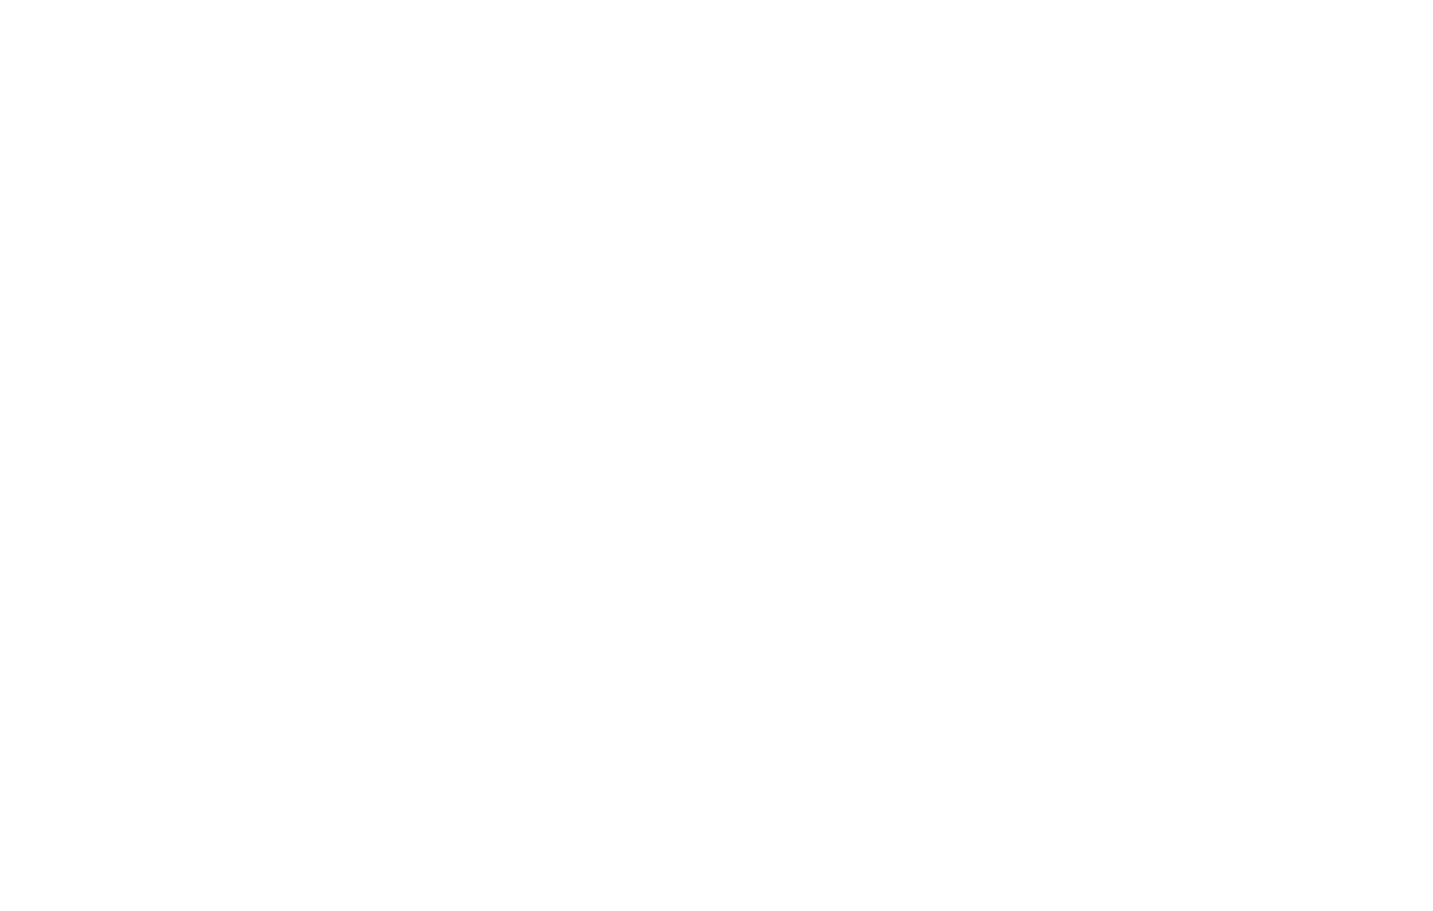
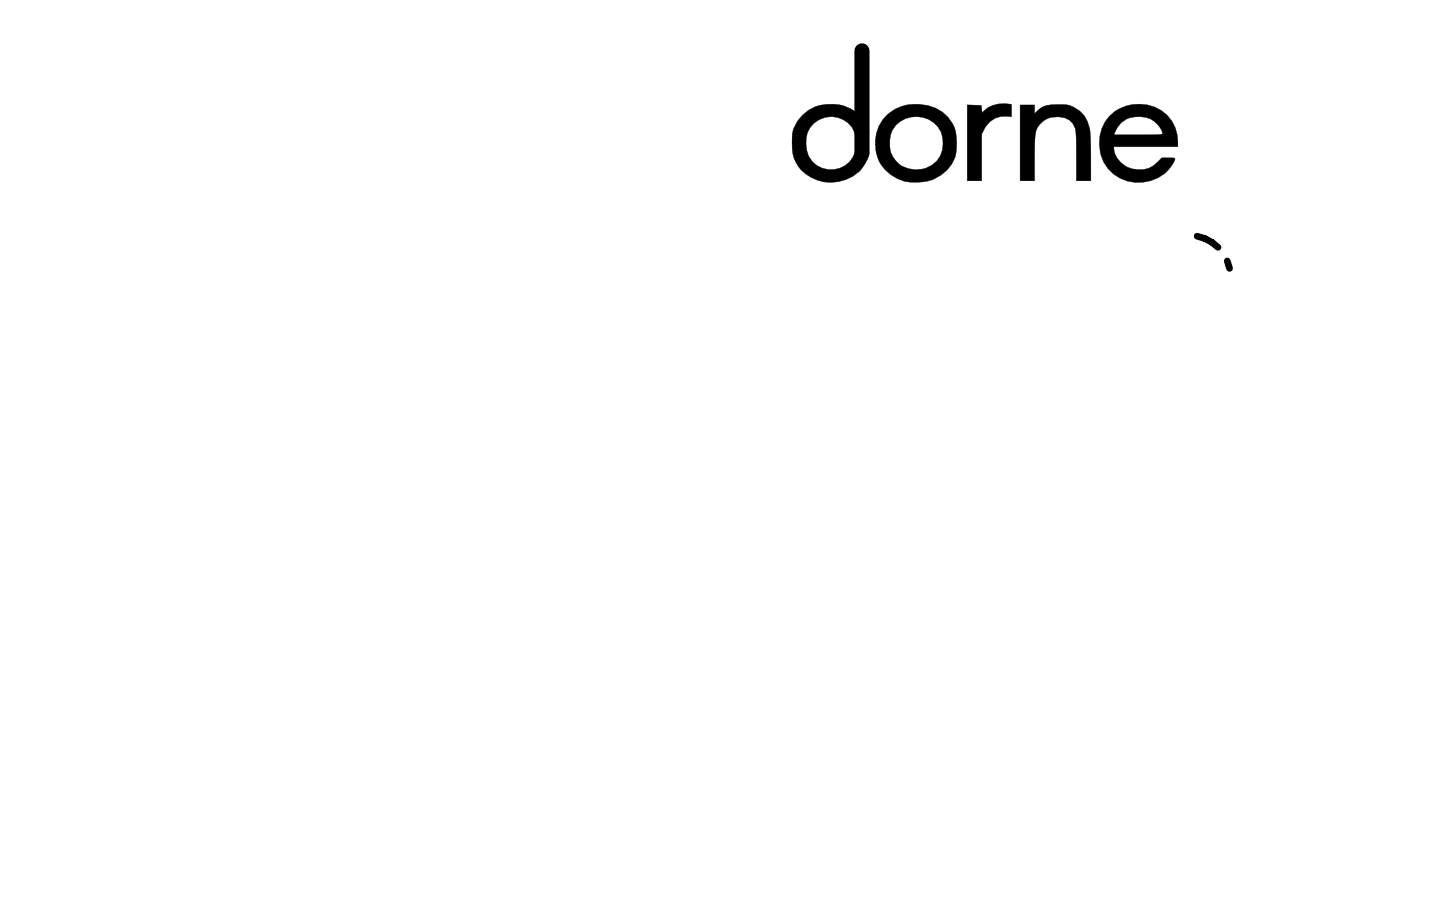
drawing: none -> [791, 43, 1179, 183]
board edge: none -> (1197, 236) (1204, 238)
board edge: none -> (1204, 238) (1218, 247)
board edge: none -> (1227, 260) (1229, 268)

